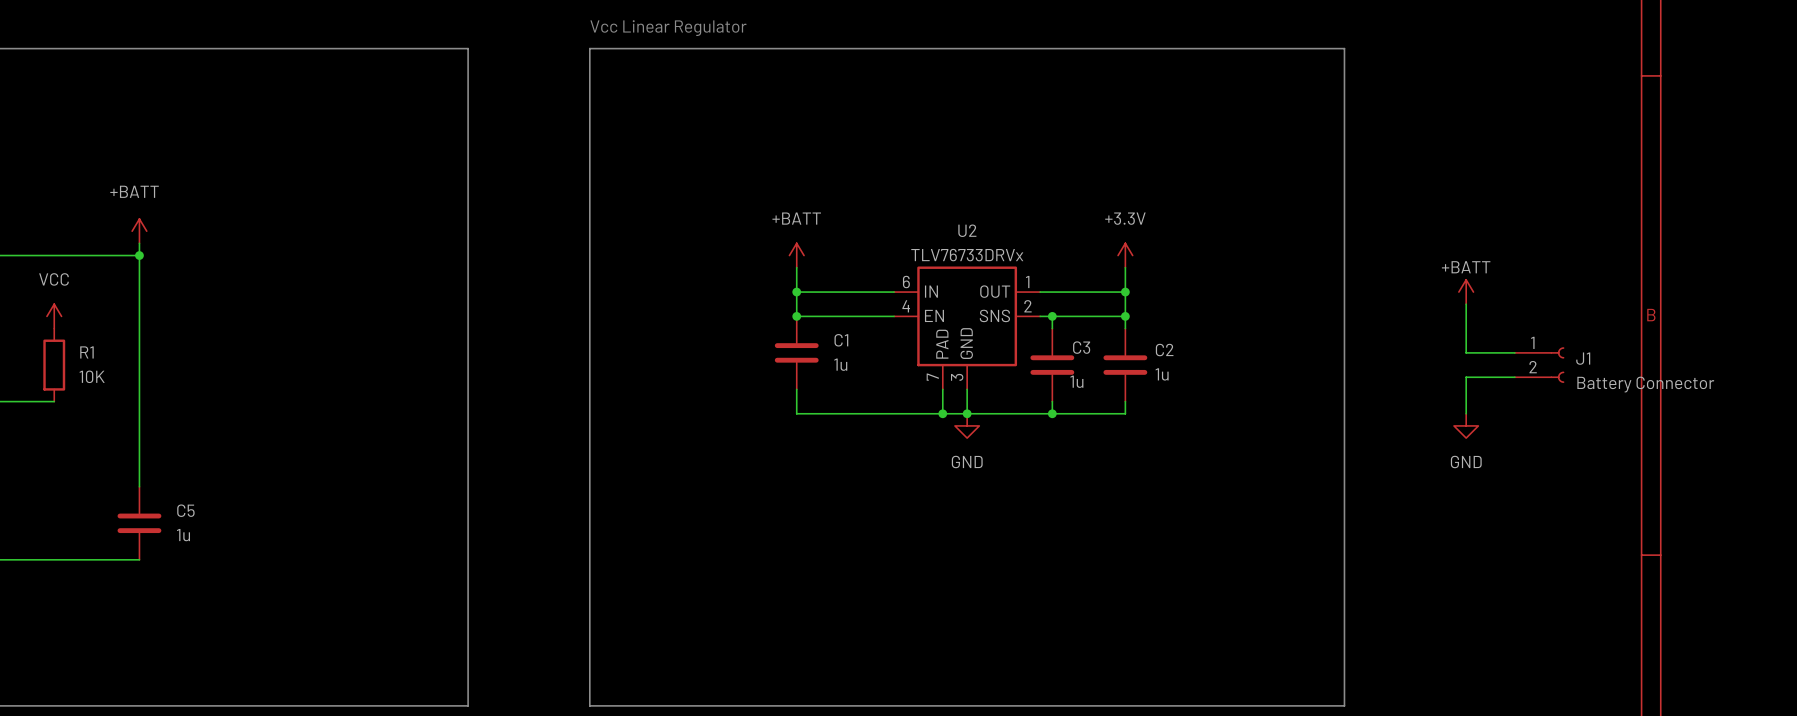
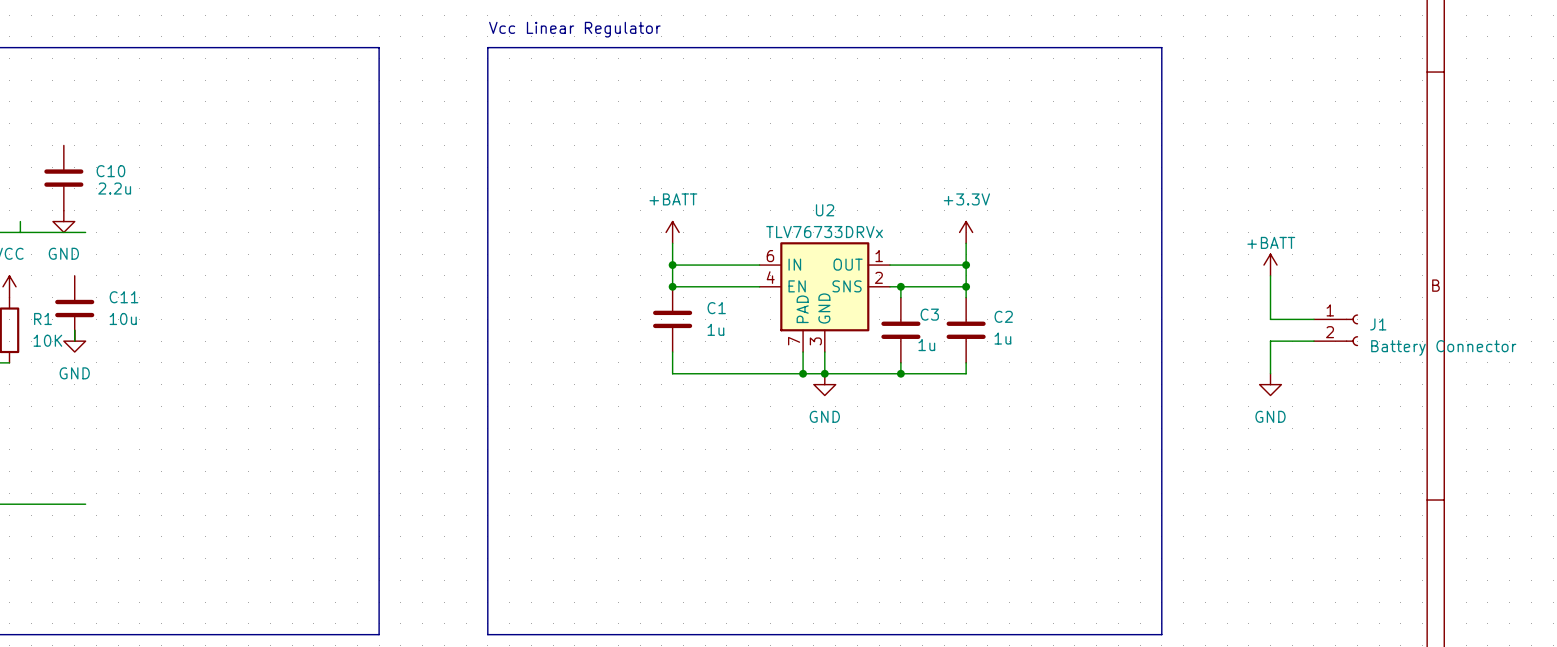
C10: none -> 2.2u (63, 178)
power symbol: +BATT (139, 231) -> none
wire: none -> (20, 221) (20, 232)
power symbol: none -> GND (63, 221)
wire: (139, 243) (139, 486) -> none
junction: (139, 255) -> none
C11: none -> 10u (74, 308)
wire: none -> (74, 330) (74, 341)
power symbol: none -> GND (74, 341)
C5: 1u (139, 523) -> none

